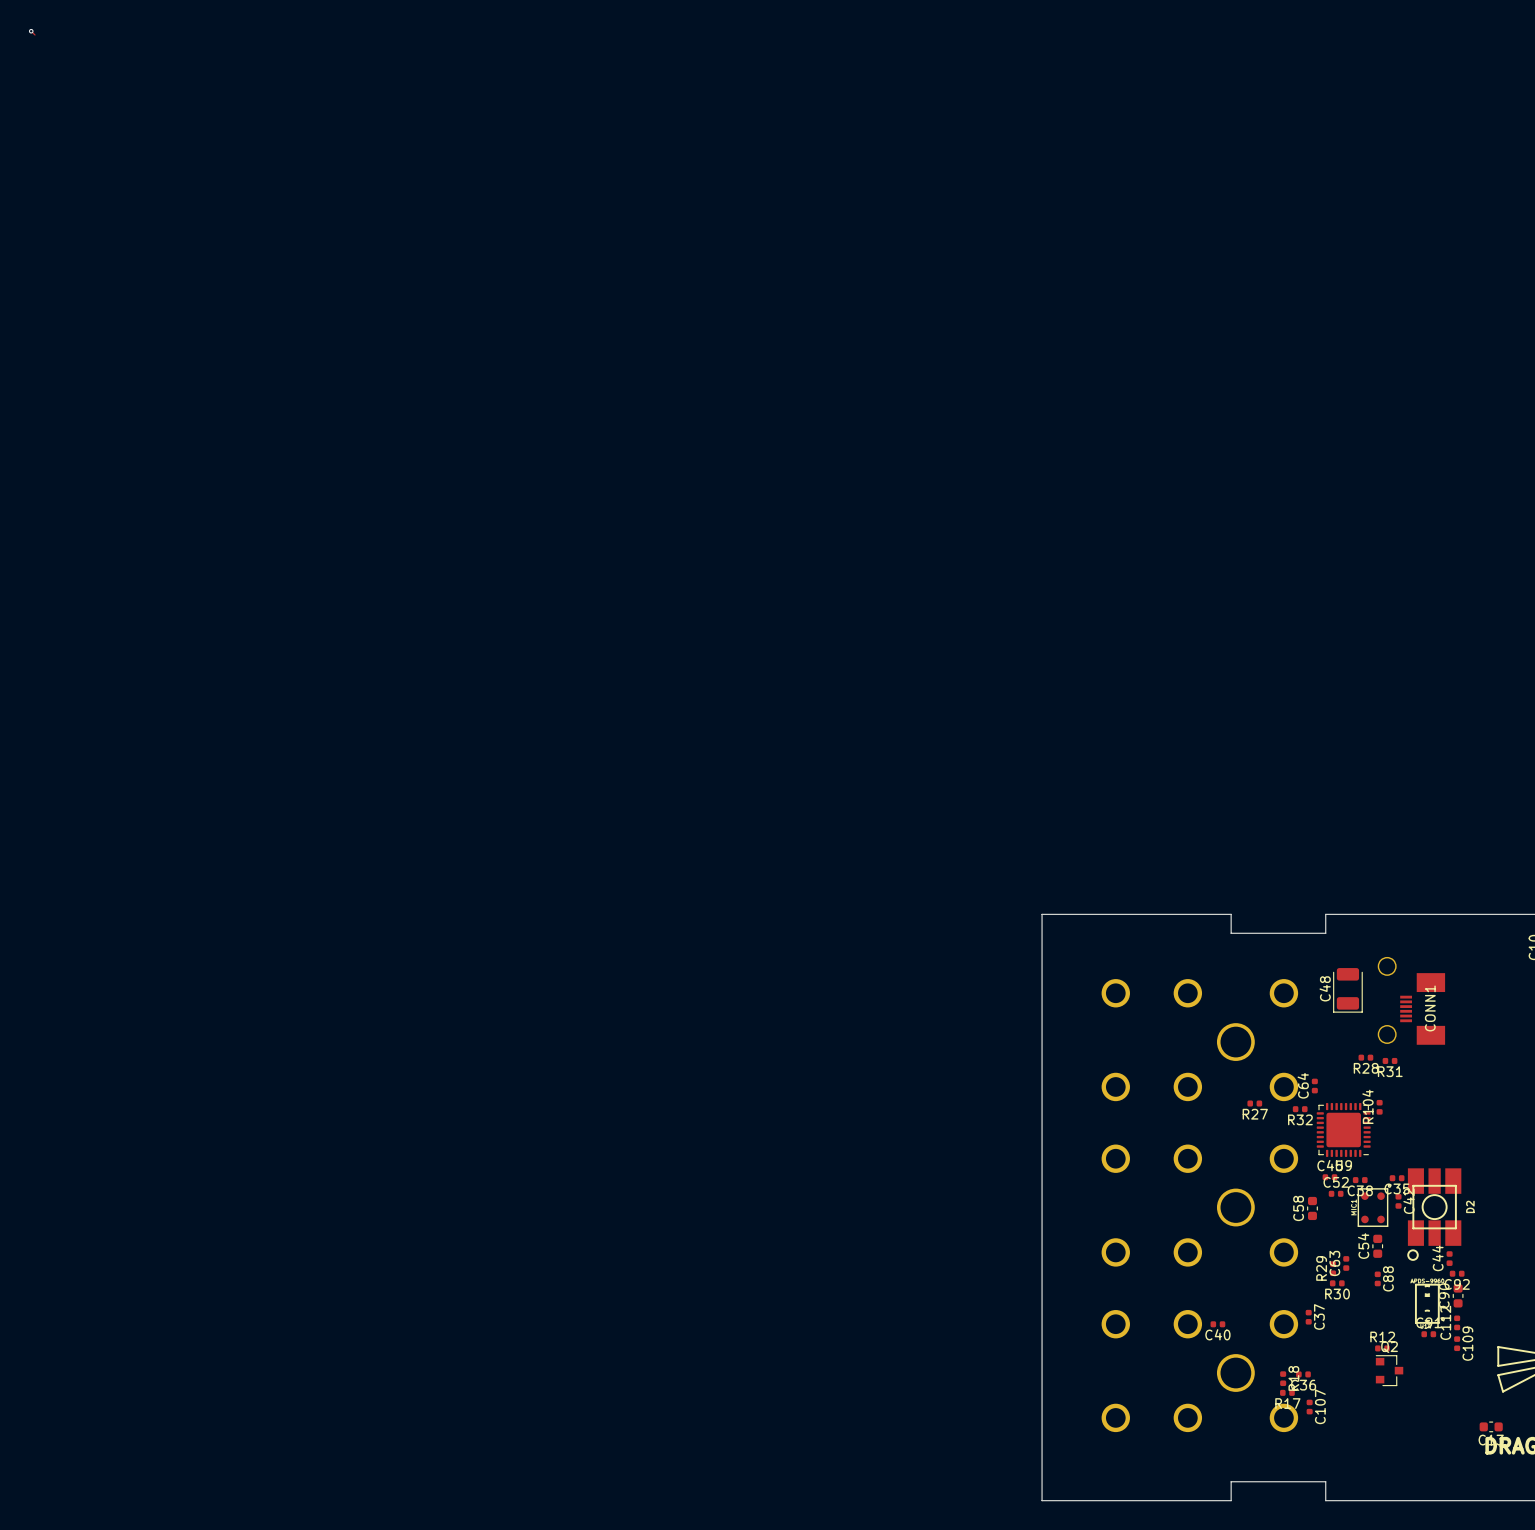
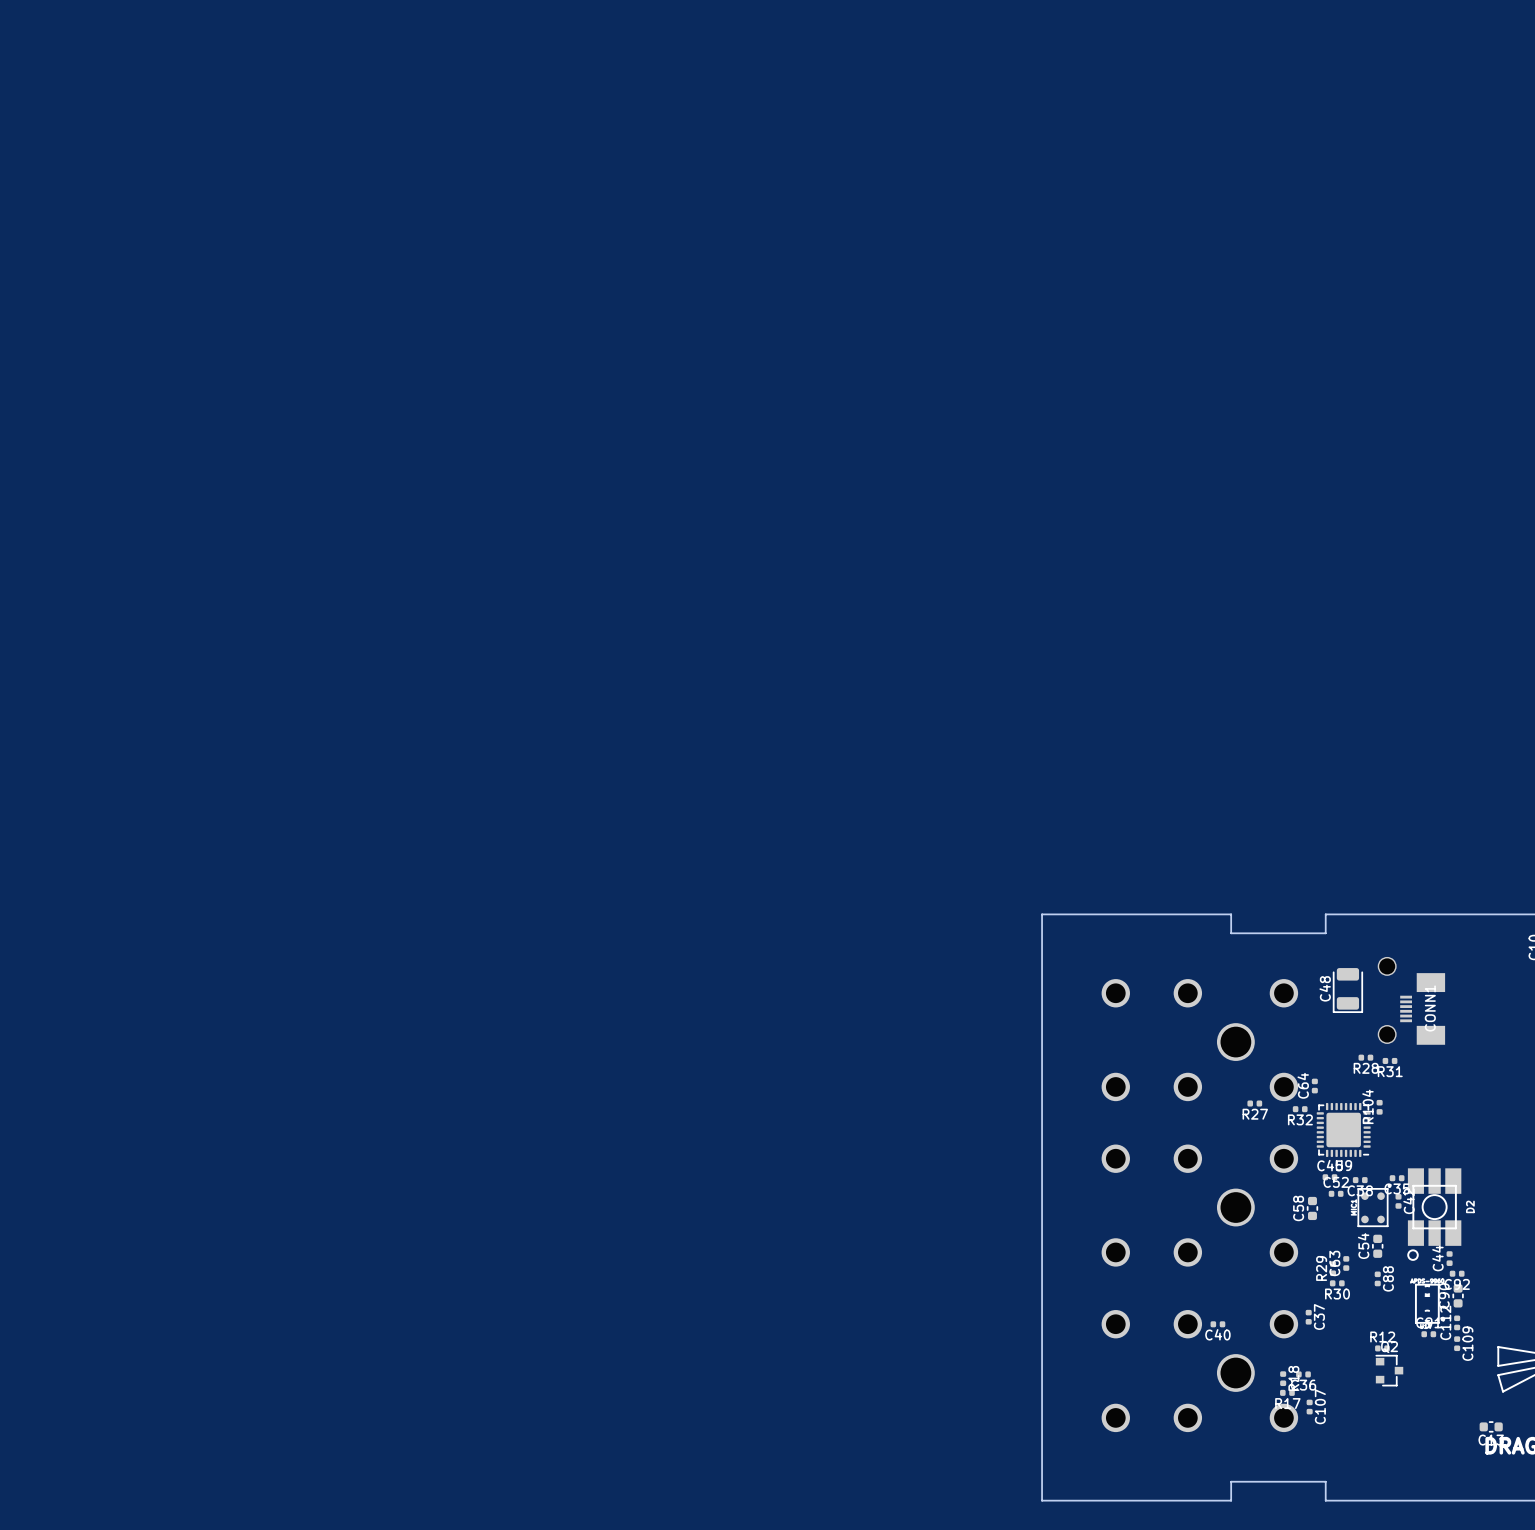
track: (31, 31) (35, 35) -> none
via: (31, 31) -> none

